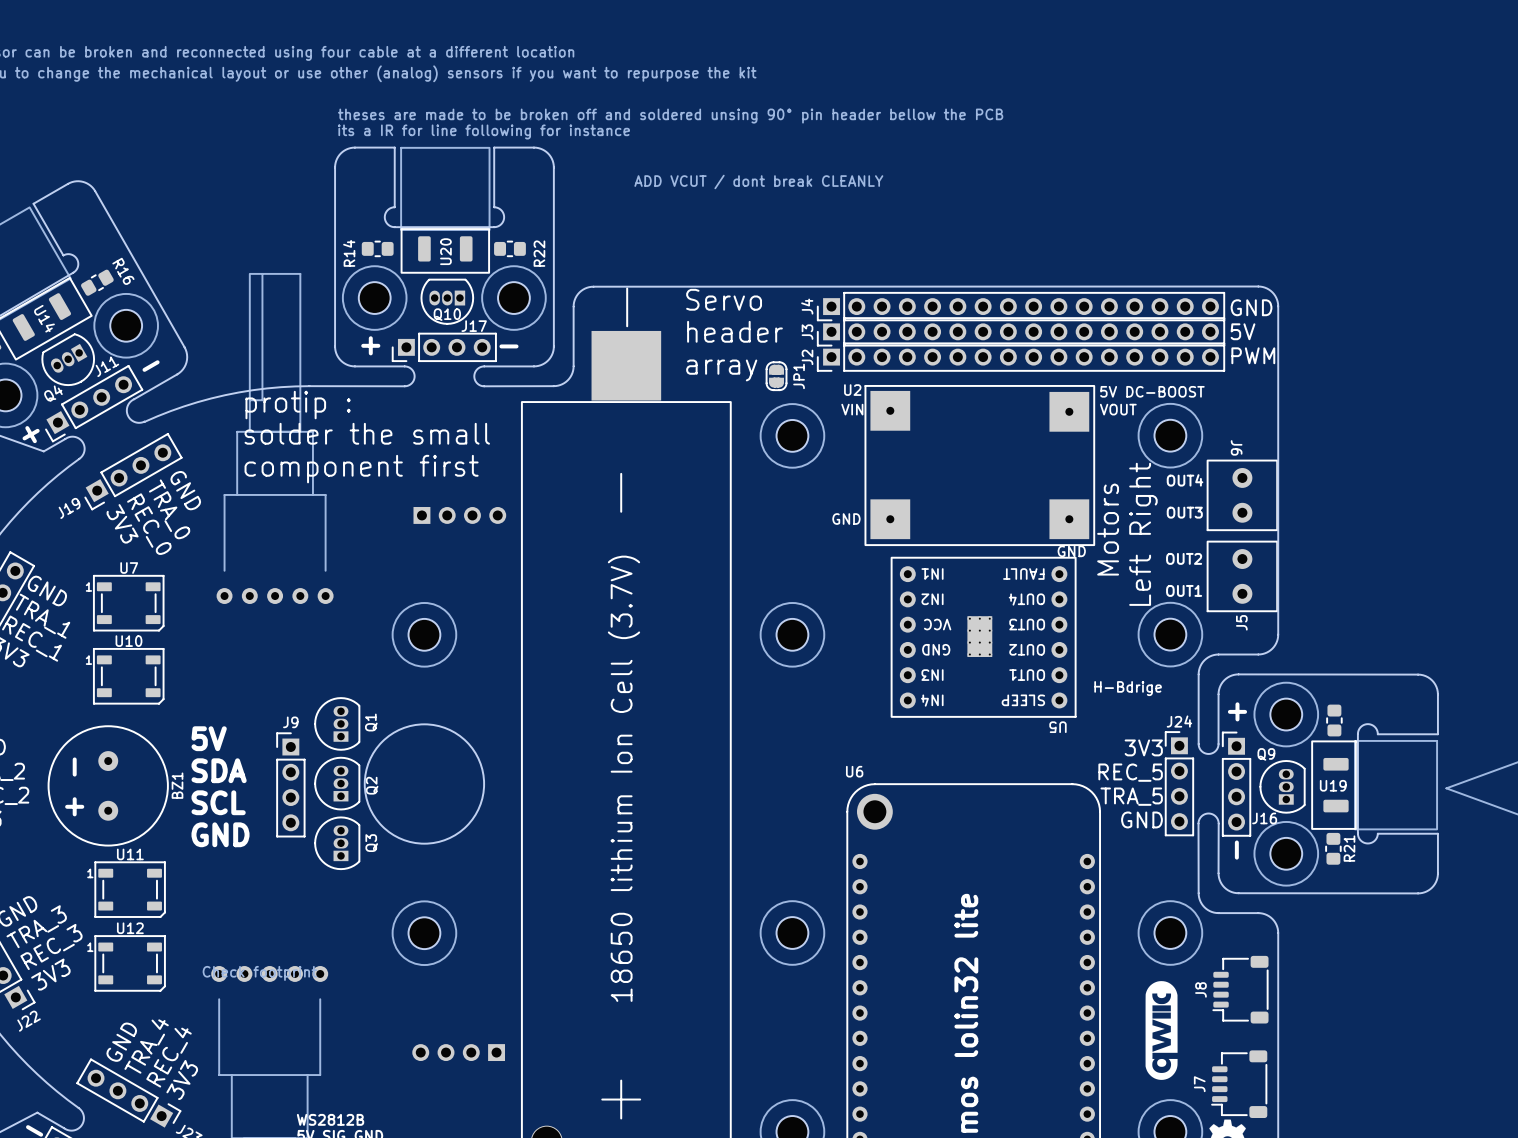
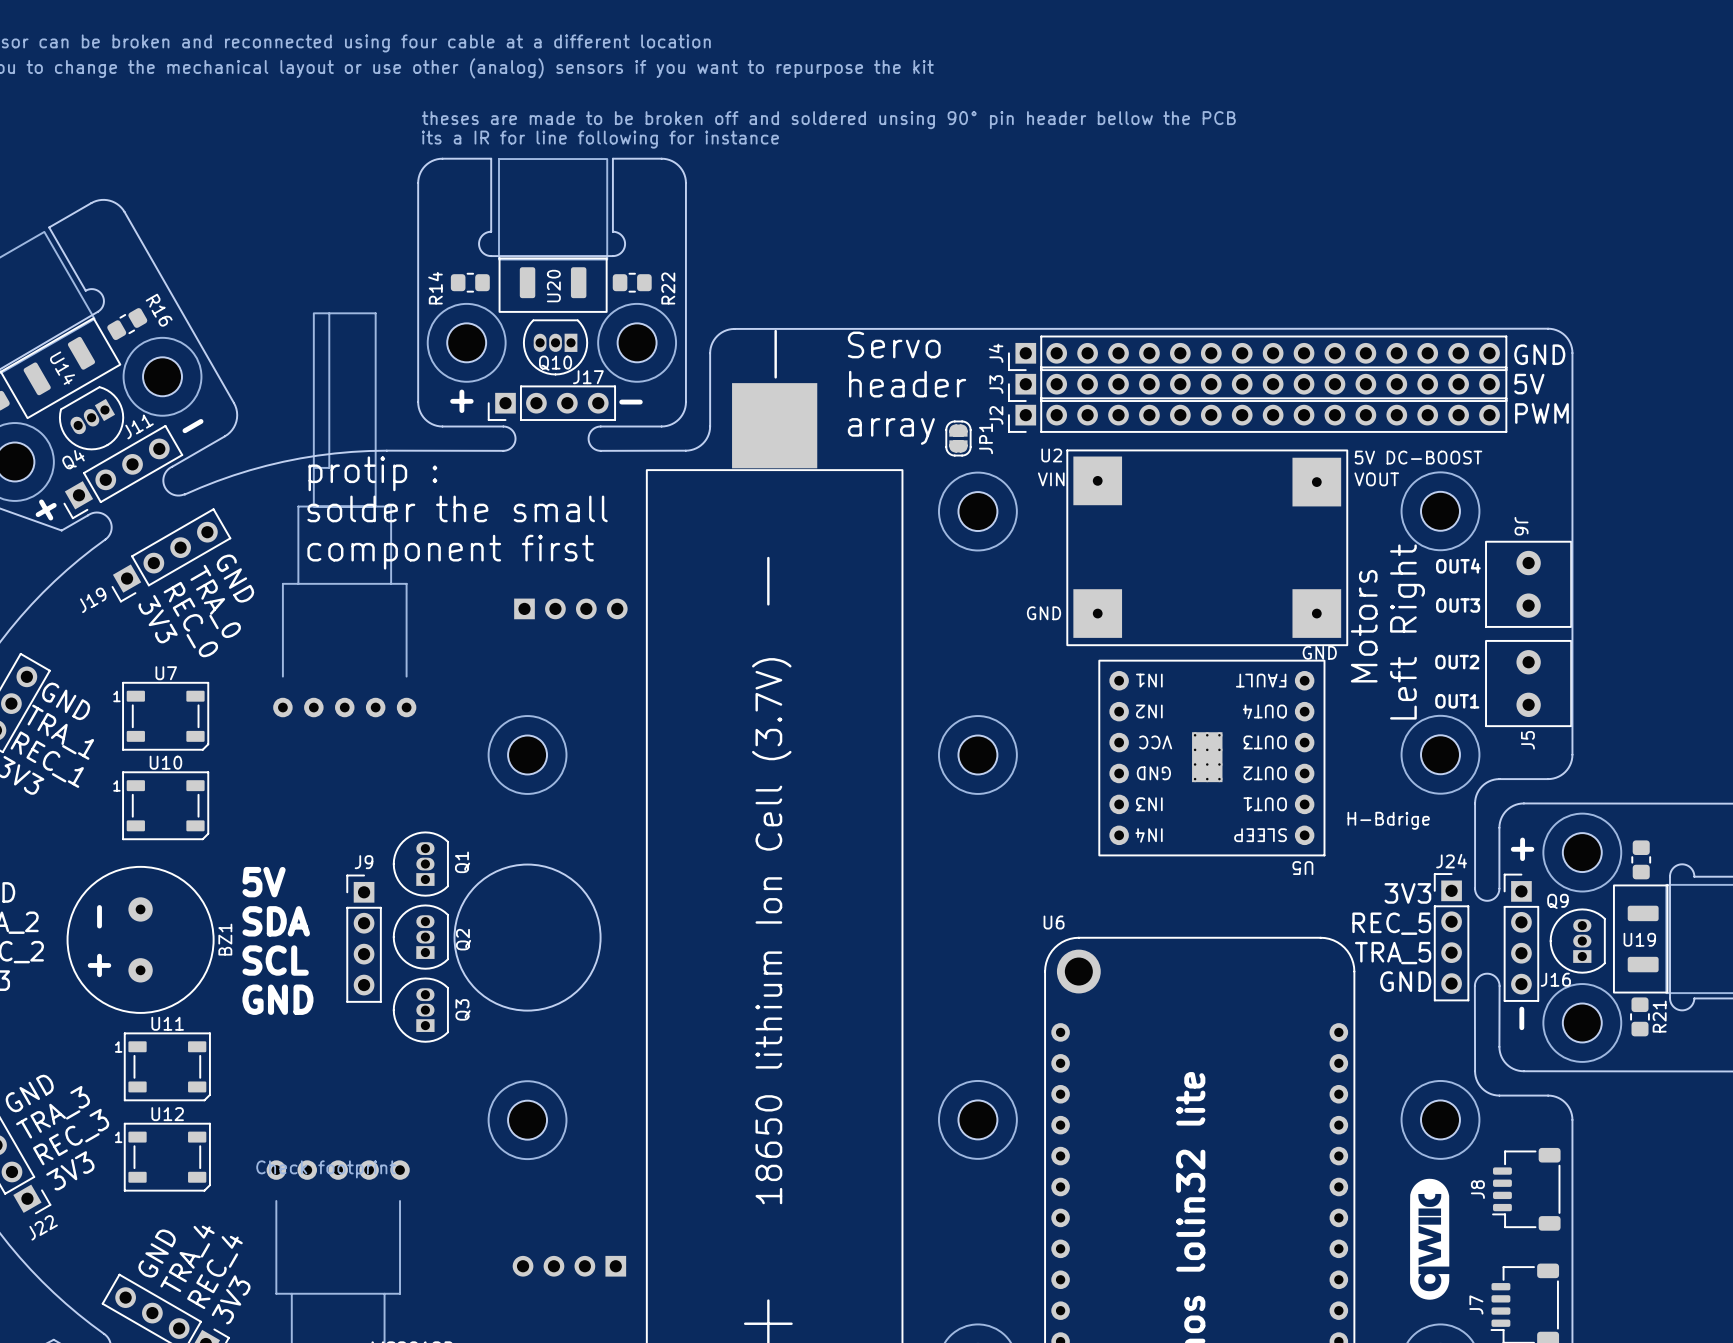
text: ADD VCUT / dont break CLEANLY (758, 181) -> none

